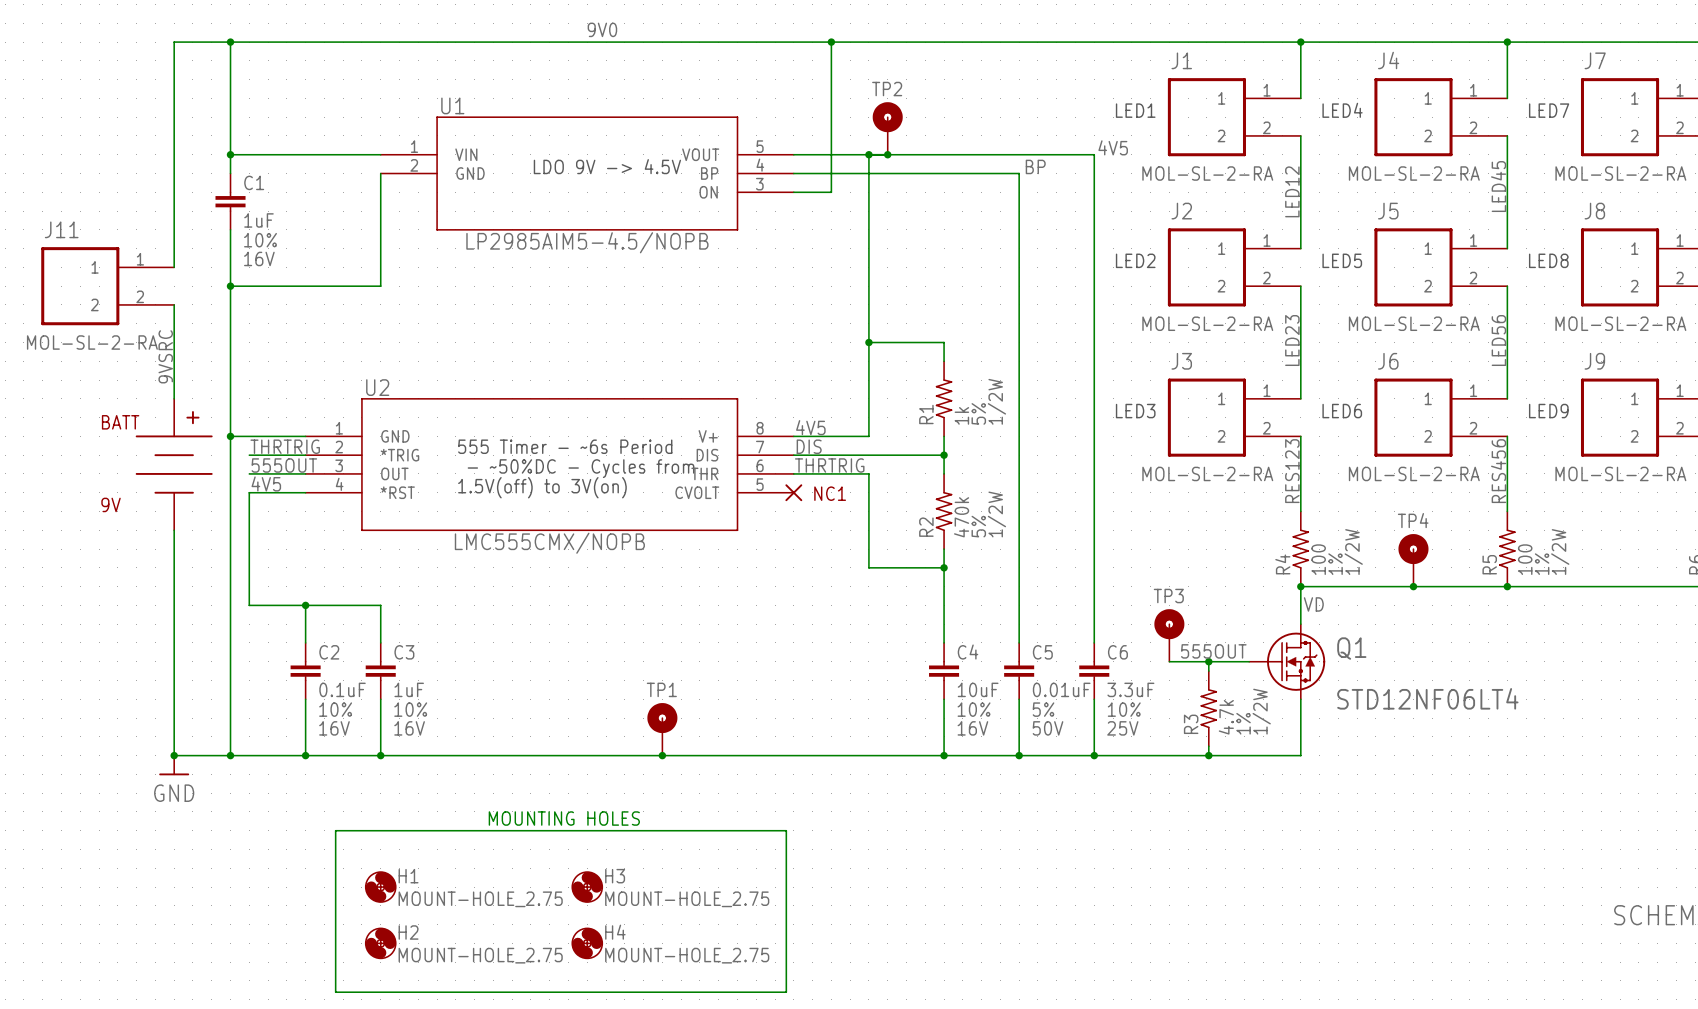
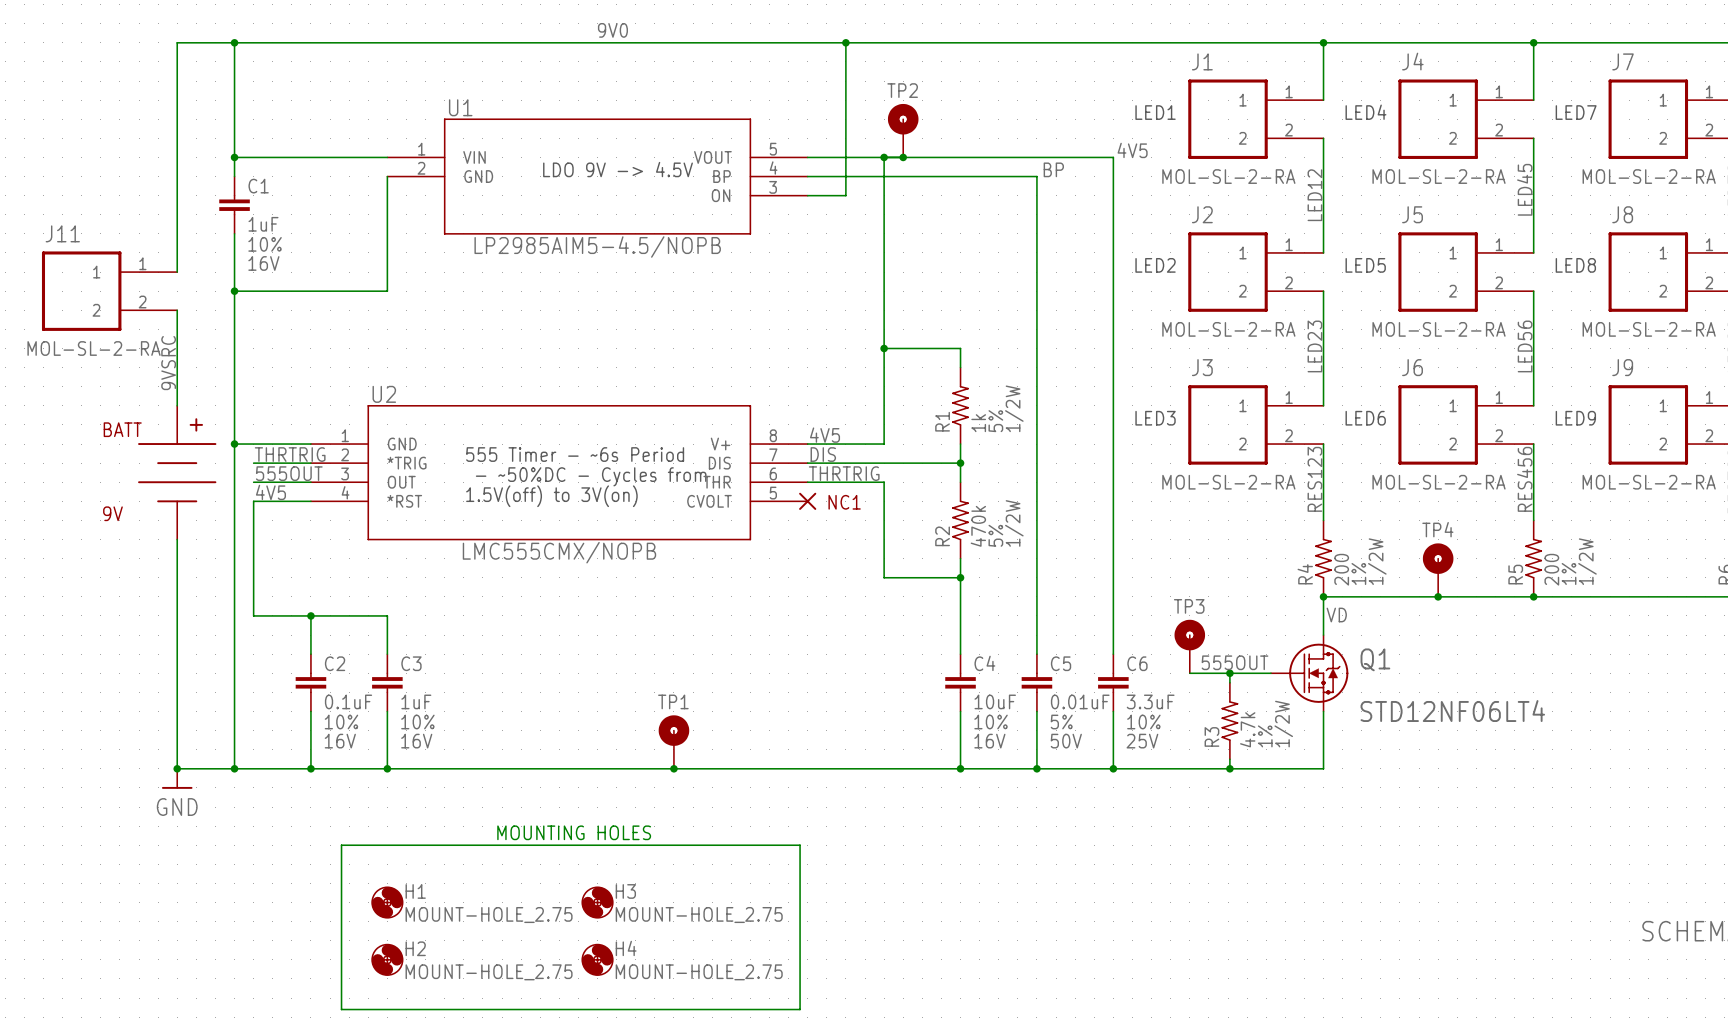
R4 value: 100 (1318, 559) -> 200 (1341, 569)
R5 value: 100 (1525, 559) -> 200 (1551, 569)

